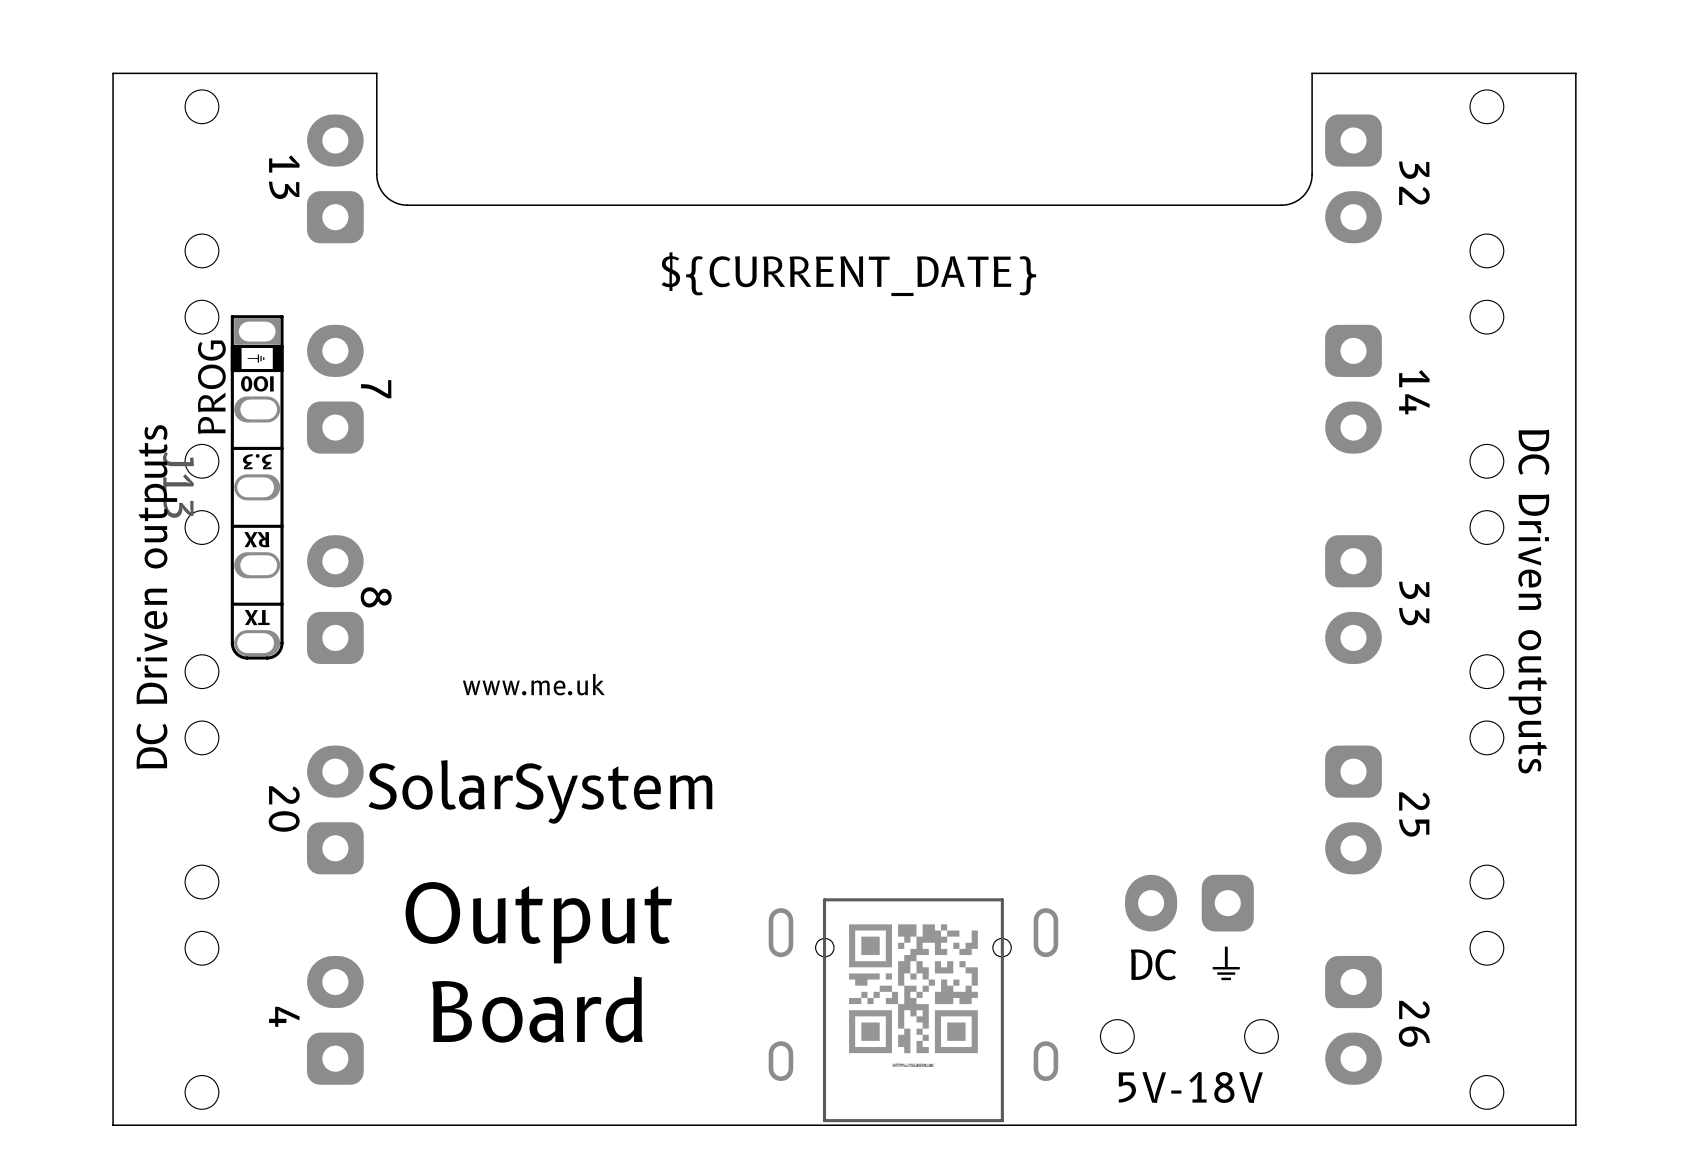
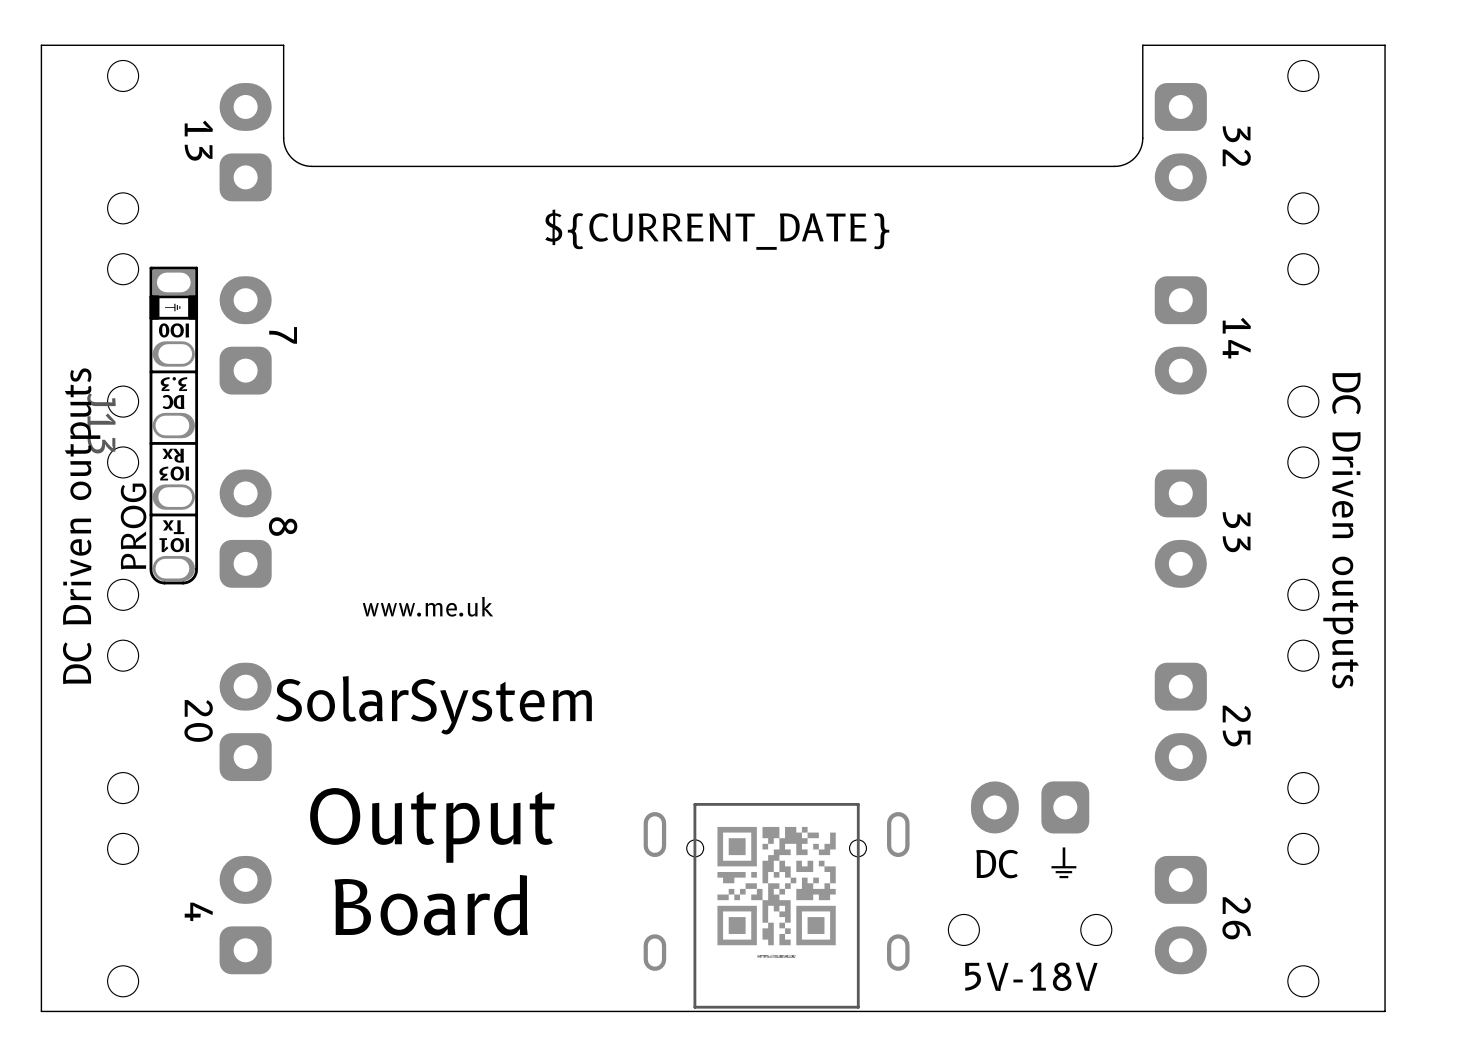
J13 footprint: [230, 315, 284, 660] -> [149, 266, 199, 585]

